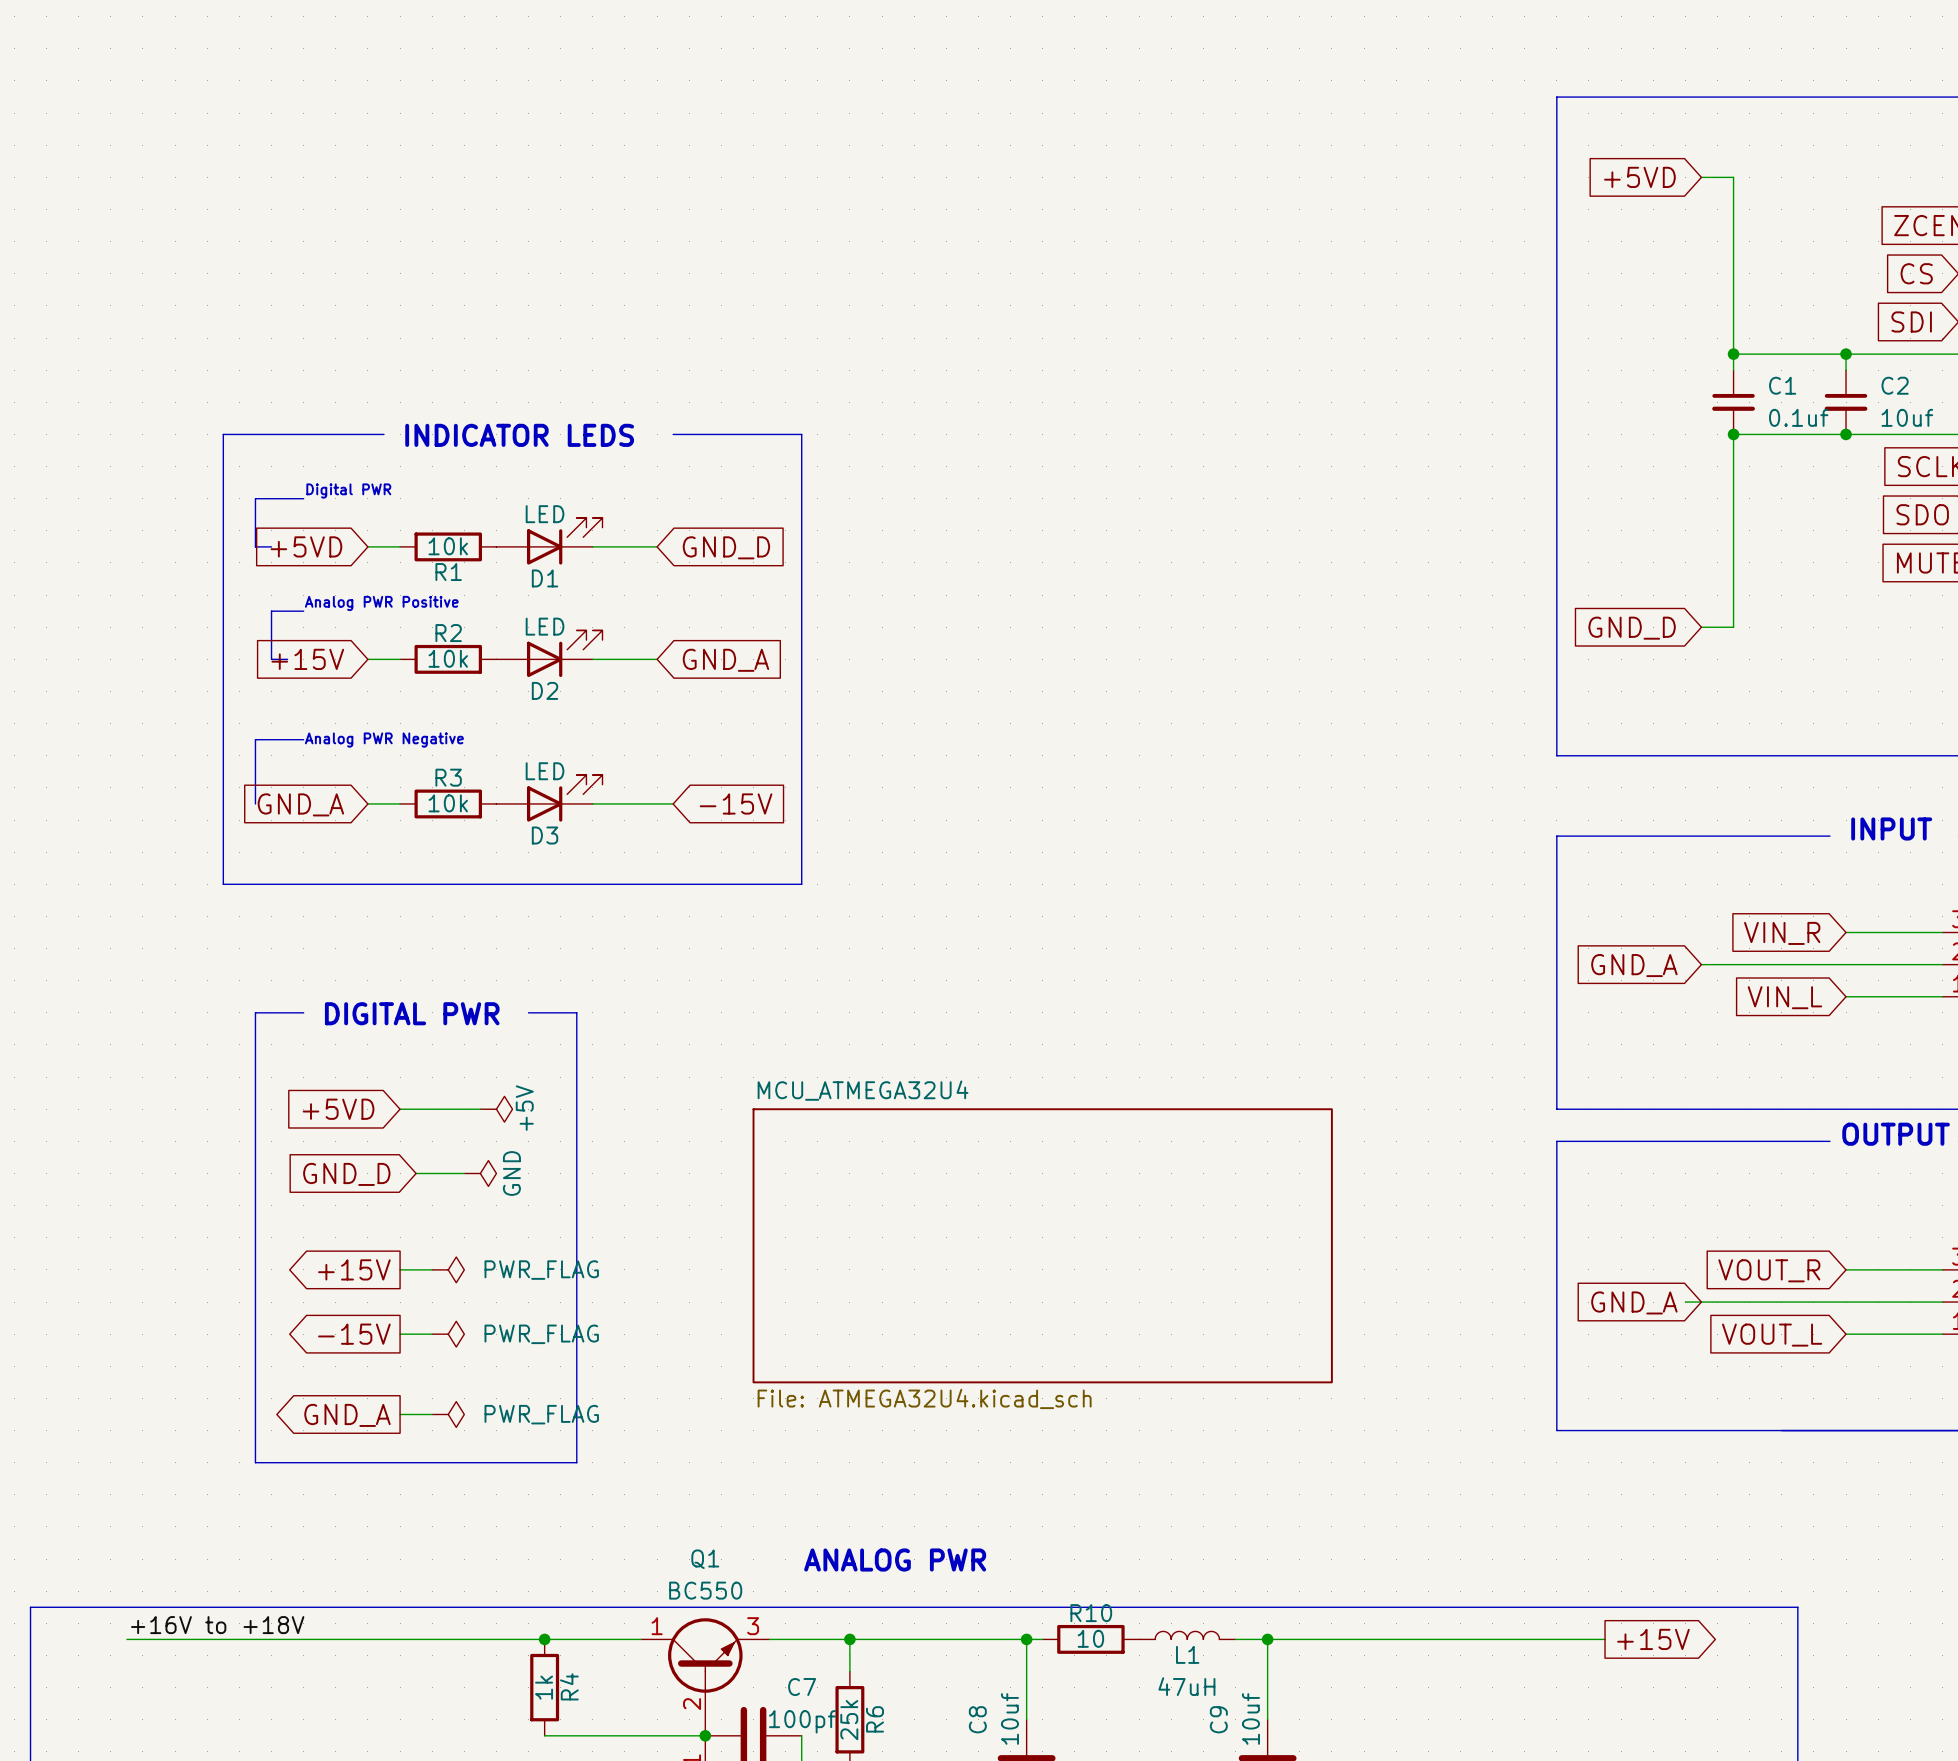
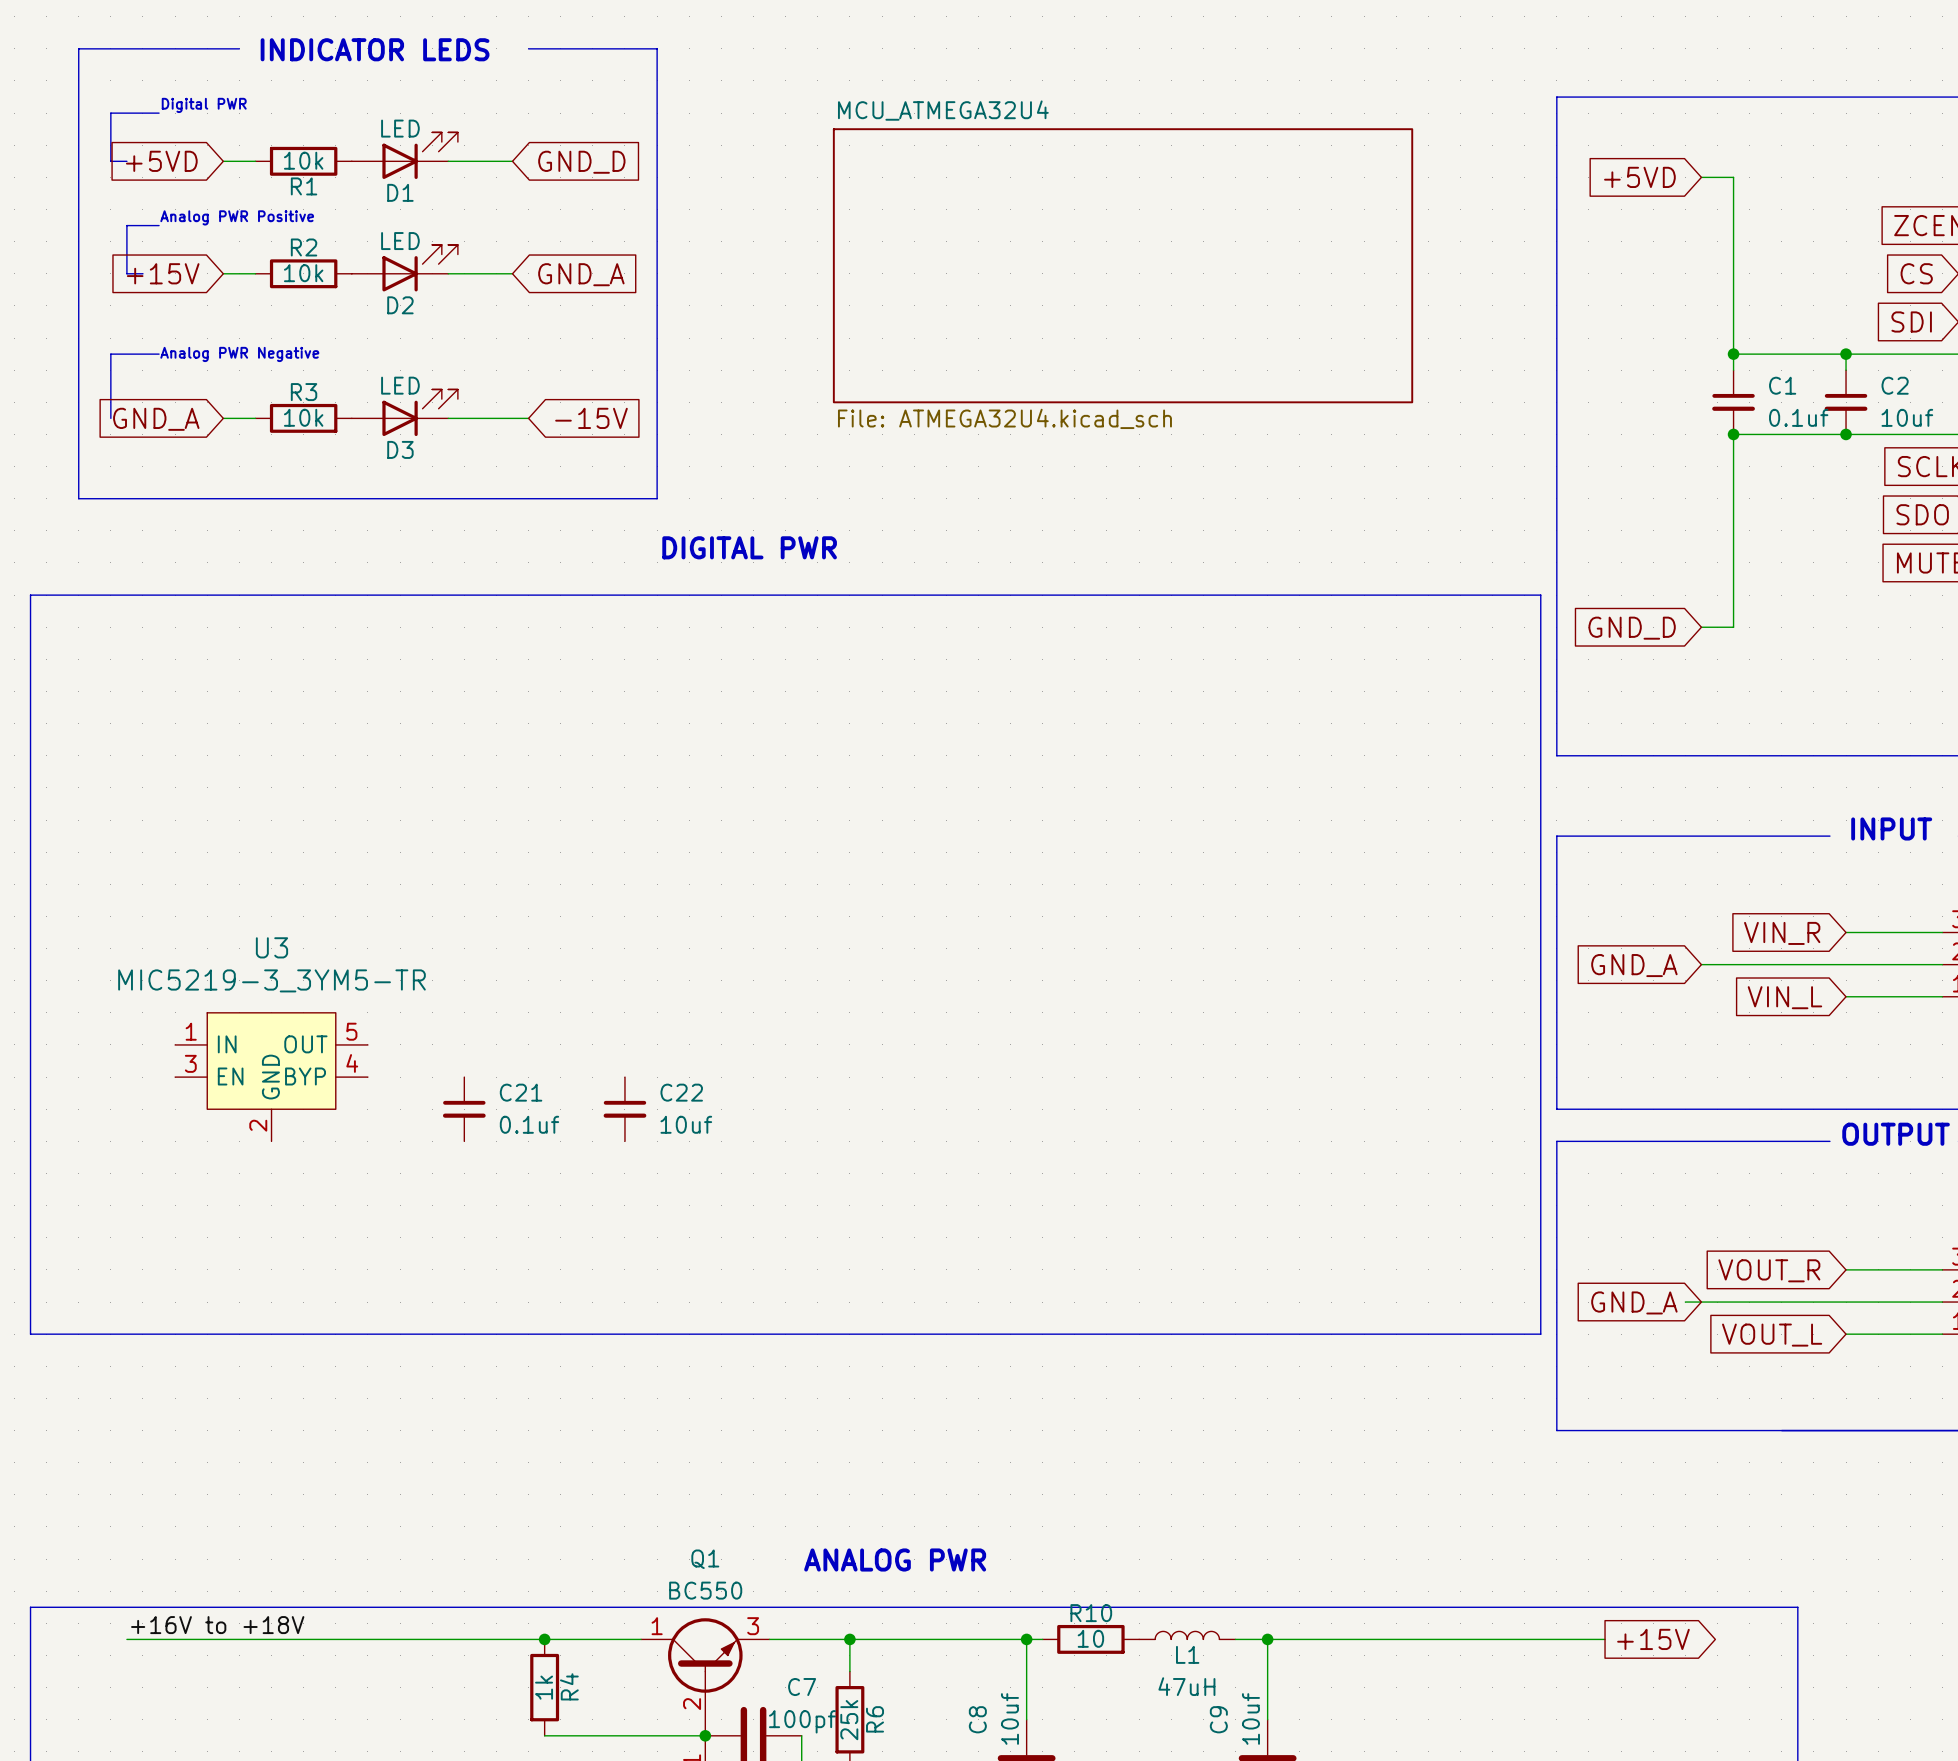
line: none -> (528, 48) (657, 48) (657, 498) (303, 498)
text: none -> INDICATOR LEDS (375, 49)
text: none -> Digital PWR (204, 105)
line: none -> (159, 113) (110, 113) (110, 161) (126, 161)
global label: none -> +5VD (161, 161)
wire: none -> (223, 161) (255, 161)
wire: none -> (448, 161) (512, 161)
global label: none -> GND_D (581, 162)
text: none -> Analog PWR Positive (237, 217)
line: none -> (159, 225) (126, 225) (126, 273) (142, 273)
global label: none -> +15V (163, 273)
global label: none -> GND_A (581, 274)
line: none -> (159, 354) (110, 354) (110, 418)
text: none -> Analog PWR Negative (239, 354)
wire: none -> (448, 418) (528, 418)
global label: none -> -15V (591, 418)
global label: none -> GND_A (156, 419)
line: (383, 434) (223, 434) (223, 884) (801, 884) (801, 434) (673, 434) -> none
text: INDICATOR LEDS (519, 435) -> none
text: Digital PWR (348, 491) -> none
line: (255, 498) (255, 546) (271, 546) -> (255, 498) (78, 498) (78, 48) (239, 48)
D1 position: (549, 541) -> (404, 155)
global label: +5VD (306, 546) -> none
wire: (367, 546) (400, 546) -> (223, 273) (255, 273)
R1 position: (448, 546) -> (303, 161)
wire: (592, 546) (657, 546) -> (448, 273) (512, 273)
global label: GND_D (726, 547) -> none
text: none -> DIGITAL PWR (749, 547)
line: none -> (30, 595) (1540, 595) (1540, 1334) (30, 1334) (30, 595)
text: Analog PWR Positive (381, 603) -> none
line: (303, 611) (271, 611) (271, 659) (287, 659) -> none
D2 position: (549, 653) -> (404, 268)
global label: +15V (307, 659) -> none
wire: (367, 659) (400, 659) -> (223, 418) (255, 418)
R2 position: (448, 659) -> (303, 273)
wire: (592, 659) (657, 659) -> none
global label: GND_A (725, 660) -> none
line: (303, 739) (255, 739) (255, 803) -> none
text: Analog PWR Negative (384, 740) -> none
D3 position: (549, 798) -> (404, 412)
wire: (367, 803) (400, 803) -> none
R3 position: (448, 803) -> (303, 418)
wire: (592, 803) (673, 803) -> none
global label: -15V (736, 803) -> none
global label: GND_A (300, 804) -> none
line: (303, 1012) (255, 1012) (255, 1462) (576, 1462) (576, 1012) (528, 1012) -> none
text: DIGITAL PWR (412, 1013) -> none
U3: none -> MIC5219-3_3YM5-TR (271, 1077)
global label: +5VD (338, 1109) -> none
wire: (400, 1109) (480, 1109) -> none
C21: none -> 0.1uf (464, 1109)
power symbol: +5V (496, 1109) -> none
C22: none -> 10uf (624, 1109)
wire: (416, 1173) (464, 1173) -> none
power symbol: GND (480, 1173) -> none
global label: GND_D (346, 1174) -> none
sheet MCU_ATMEGA32U4 position: (1042, 1245) -> (1123, 265)
global label: +15V (354, 1269) -> none
wire: (400, 1269) (432, 1269) -> none
power symbol: PWR_FLAG (448, 1269) -> none
global label: -15V (354, 1334) -> none
power symbol: PWR_FLAG (448, 1334) -> none
wire: (400, 1414) (432, 1414) -> none
power symbol: PWR_FLAG (448, 1414) -> none
global label: GND_A (347, 1415) -> none

